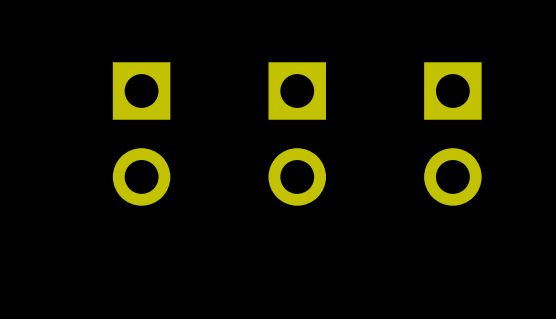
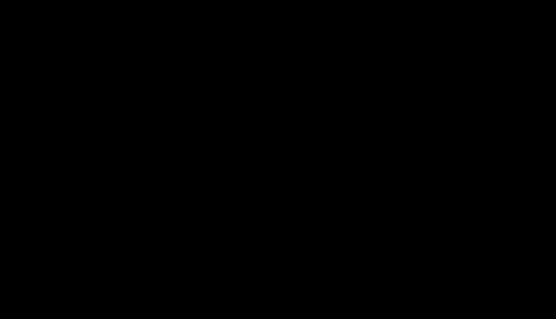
part: (141, 133) -> none
part: (297, 133) -> none
part: (452, 133) -> none

